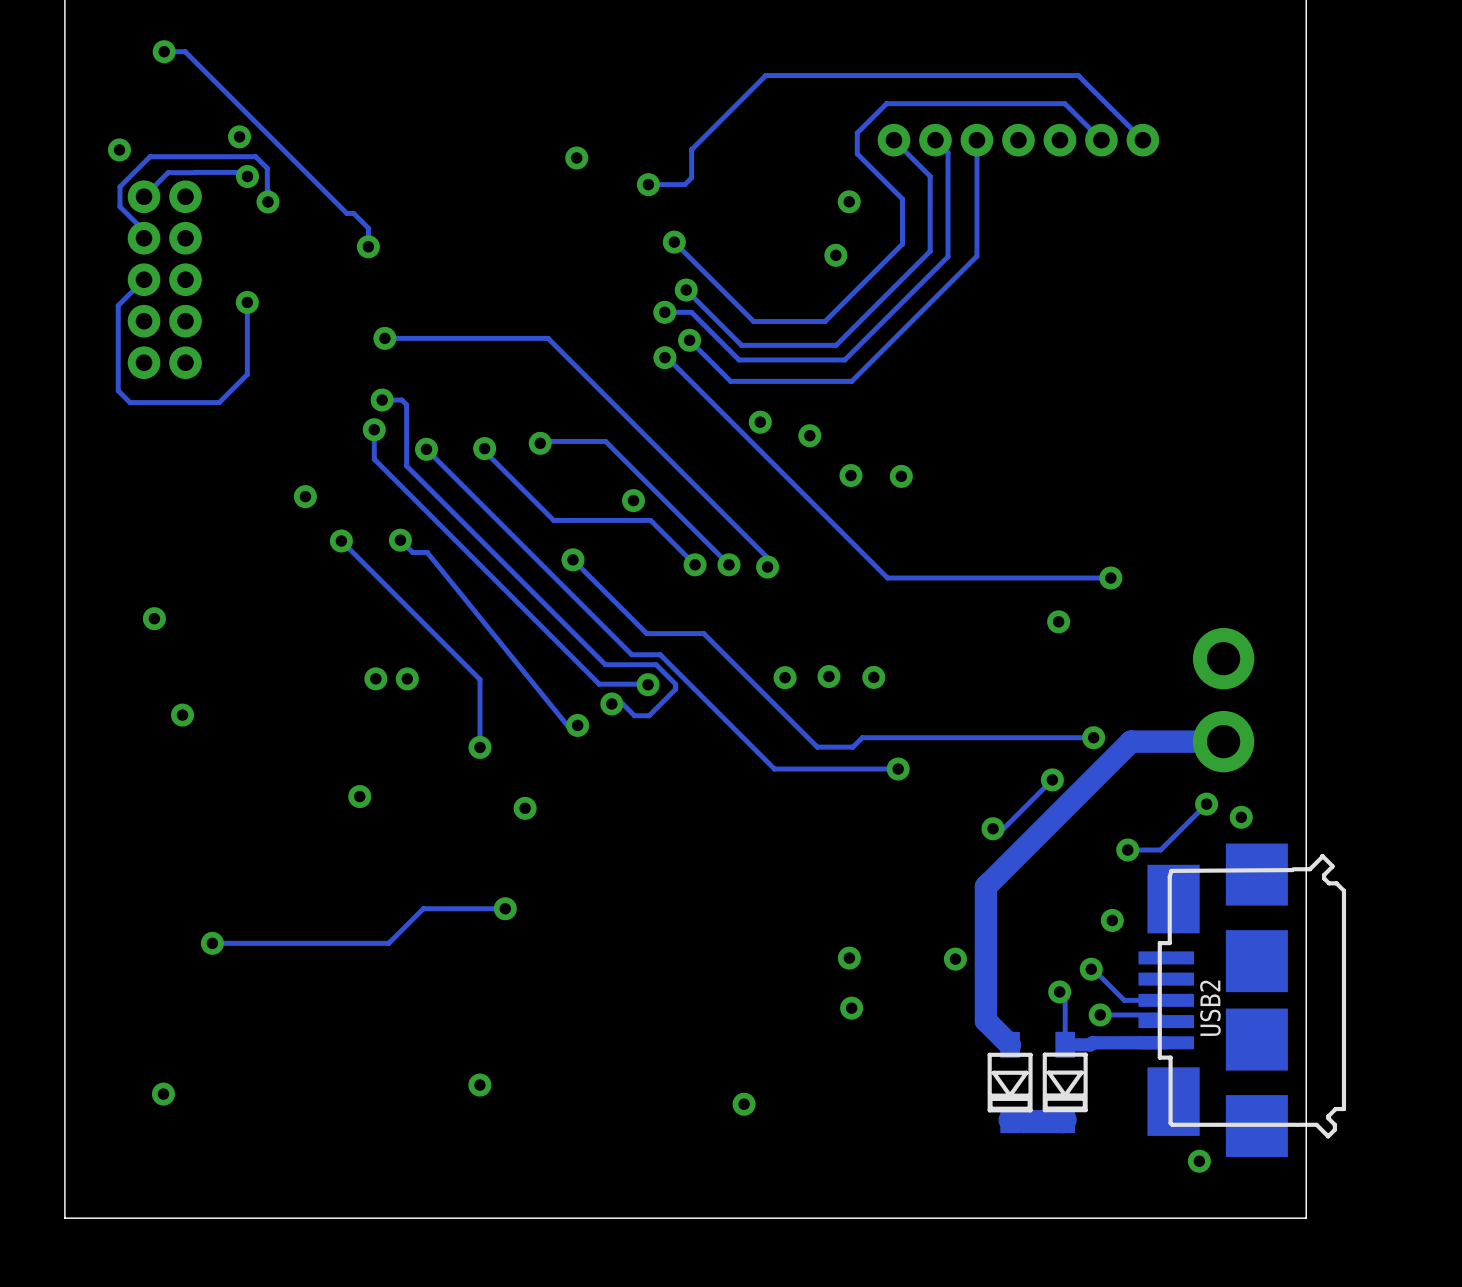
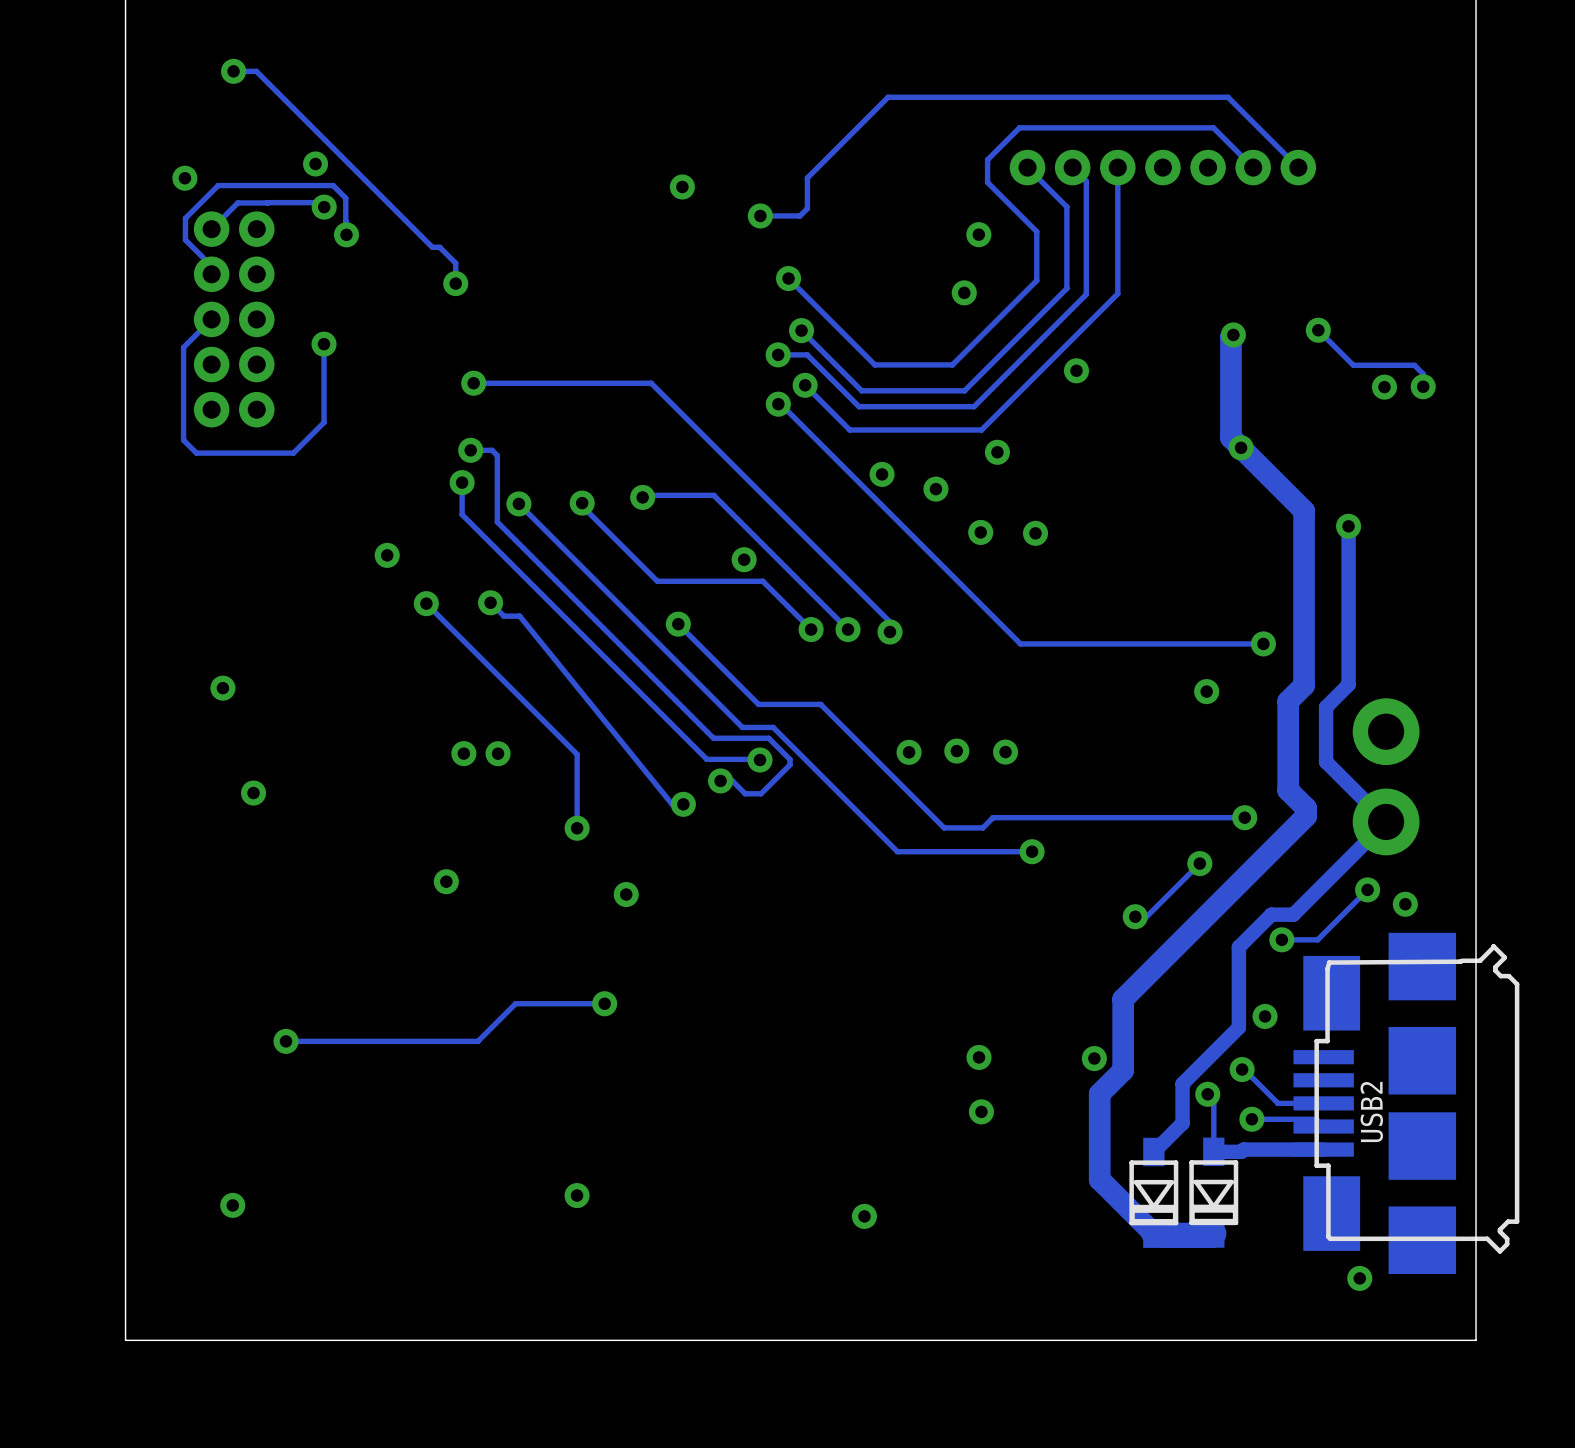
track: none -> (1318, 330) (1353, 365) (1414, 365) (1423, 374) (1423, 386)
via: none -> (1318, 330)
track: none -> (1233, 334) (1230, 337) (1230, 437) (1304, 510) (1304, 685) (1288, 701) (1288, 790) (1306, 808) (1306, 816) (1123, 999) (1123, 1070) (1099, 1093) (1099, 1179) (1153, 1233)
via: none -> (1233, 334)
via: none -> (1076, 370)
via: none -> (1384, 387)
via: none -> (1423, 386)
via: none -> (1241, 447)
via: none -> (997, 452)
via: none -> (1348, 526)
track: (1223, 741) (1131, 741) (985, 886) (985, 1020) (1010, 1045) -> (1348, 526) (1348, 684) (1326, 707) (1326, 761) (1386, 821) (1293, 914) (1271, 914) (1238, 947) (1238, 1027) (1182, 1083) (1182, 1123) (1153, 1151)

